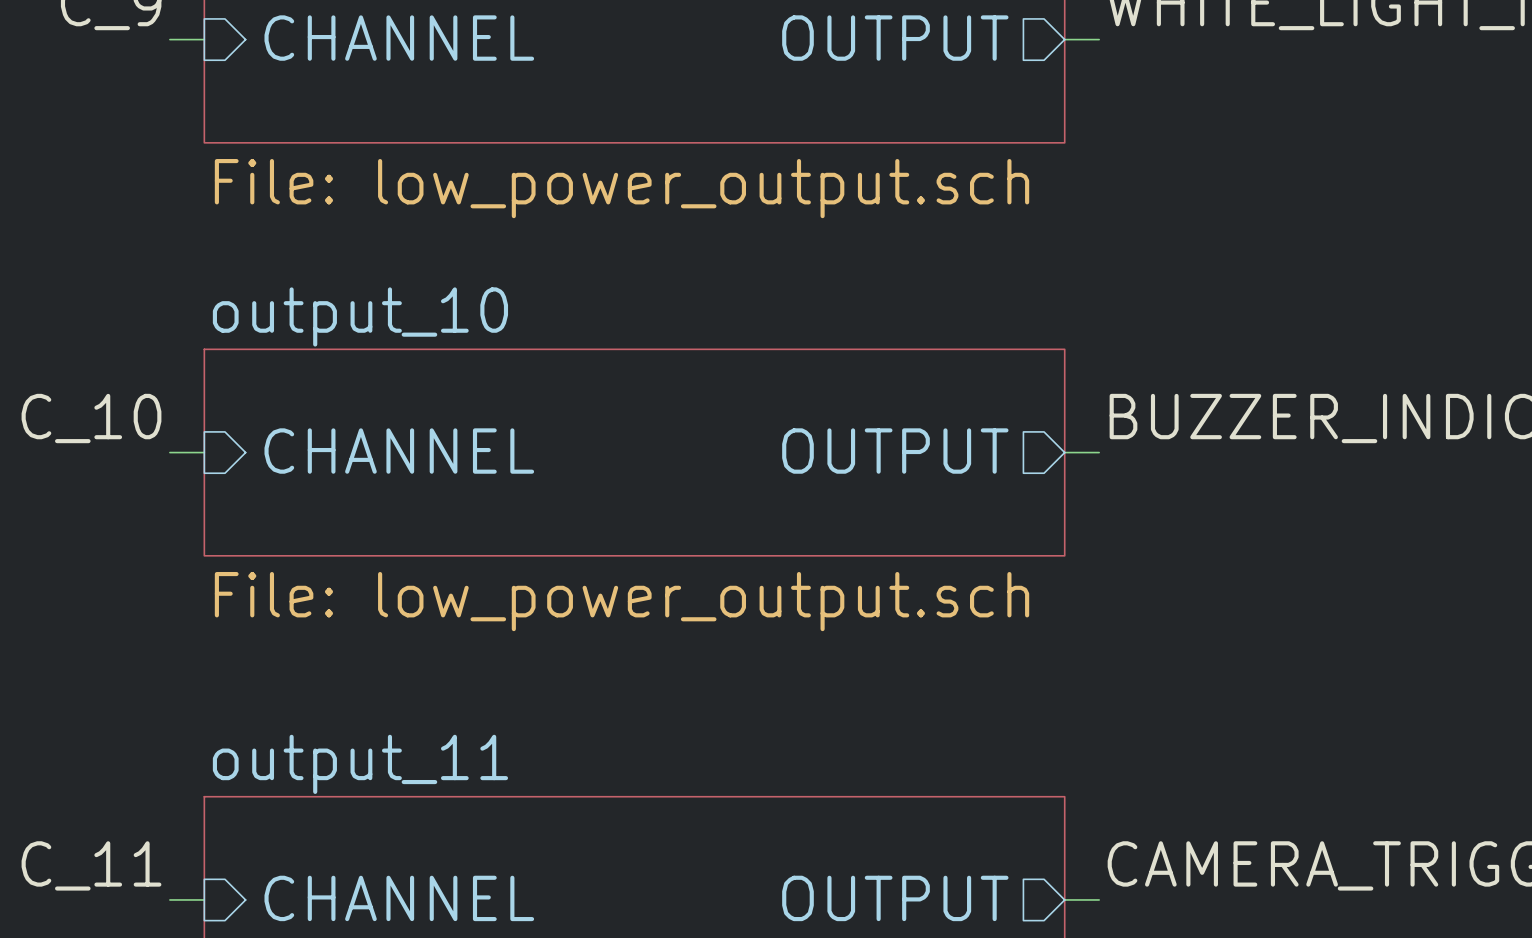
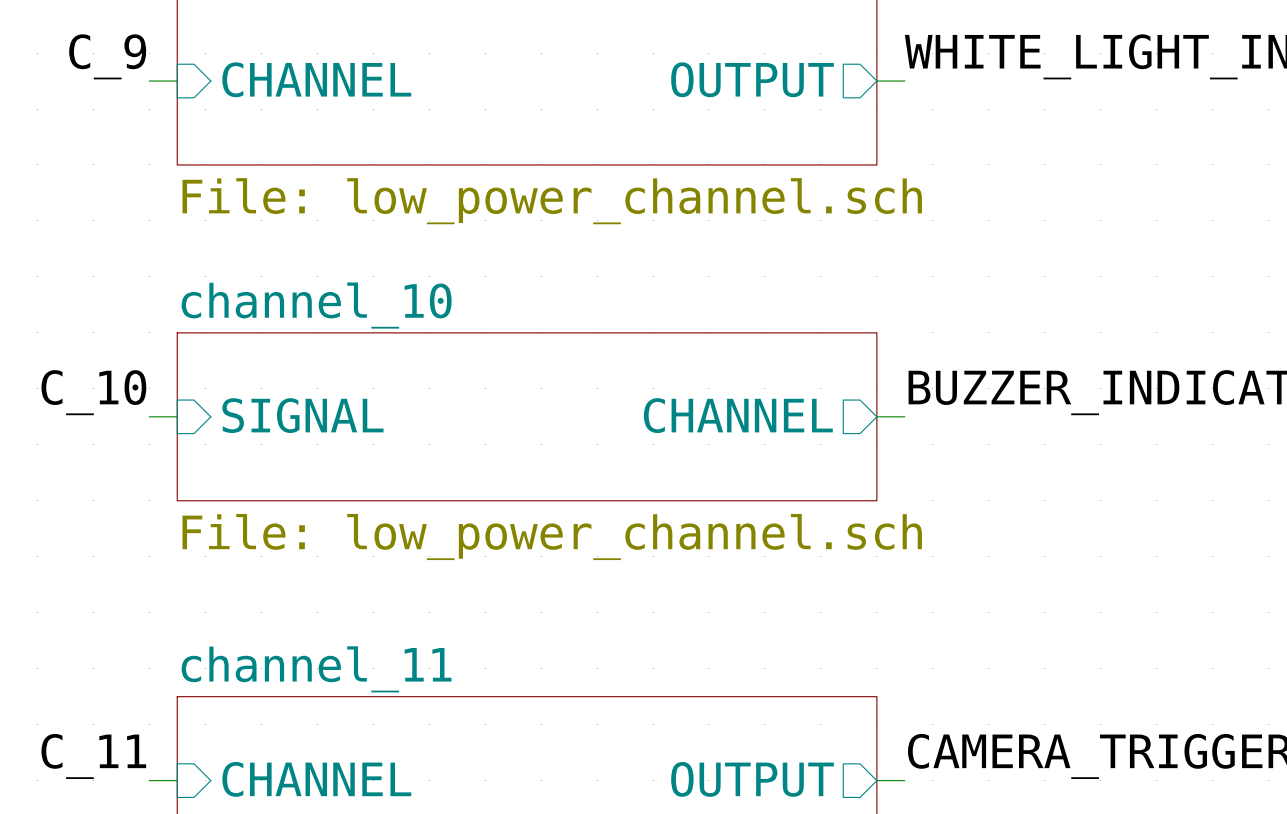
sheet value: File: low_power_output.sch (622, 188) -> File: low_power_channel.sch (552, 201)
sheet output_10 name: output_10 (360, 316) -> channel_10 (316, 305)
sheet pin: CHANNEL (399, 451) -> SIGNAL (302, 415)
sheet pin: OUTPUT (895, 451) -> CHANNEL (738, 415)
sheet output_10 value: File: low_power_output.sch (622, 601) -> File: low_power_channel.sch (552, 537)
sheet output_11 name: output_11 (360, 764) -> channel_11 (316, 669)

